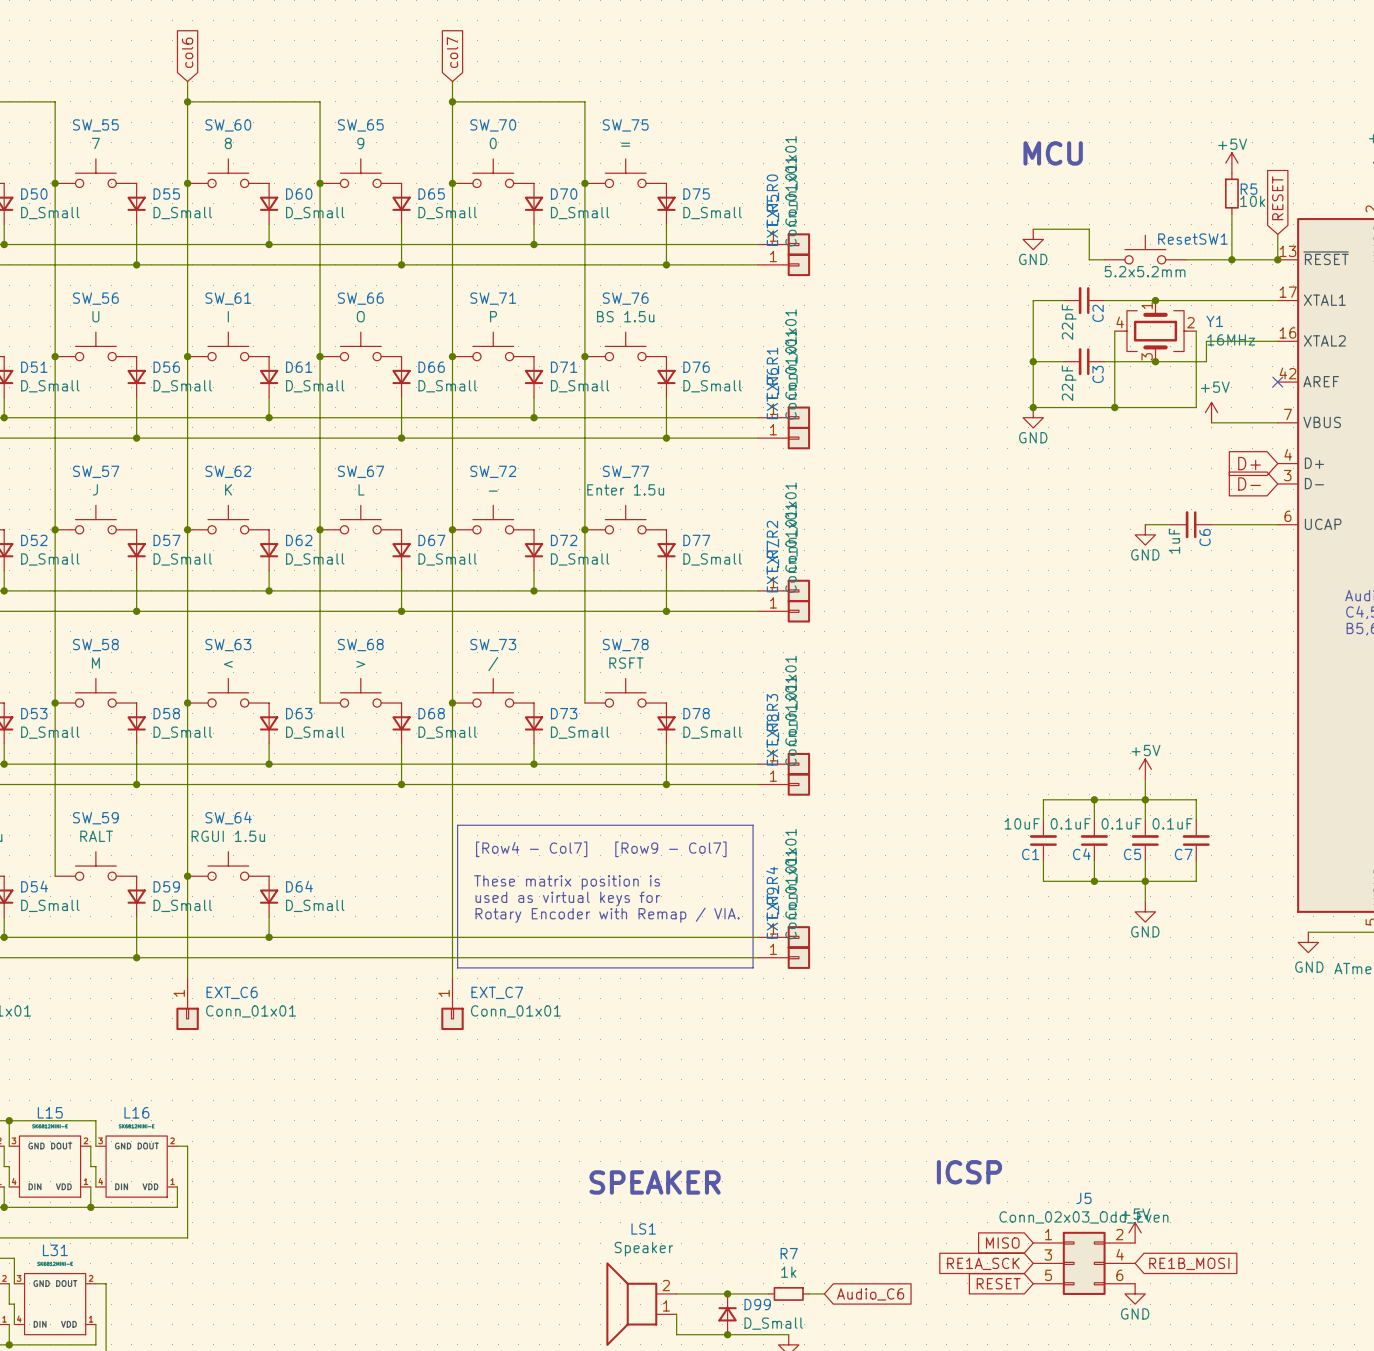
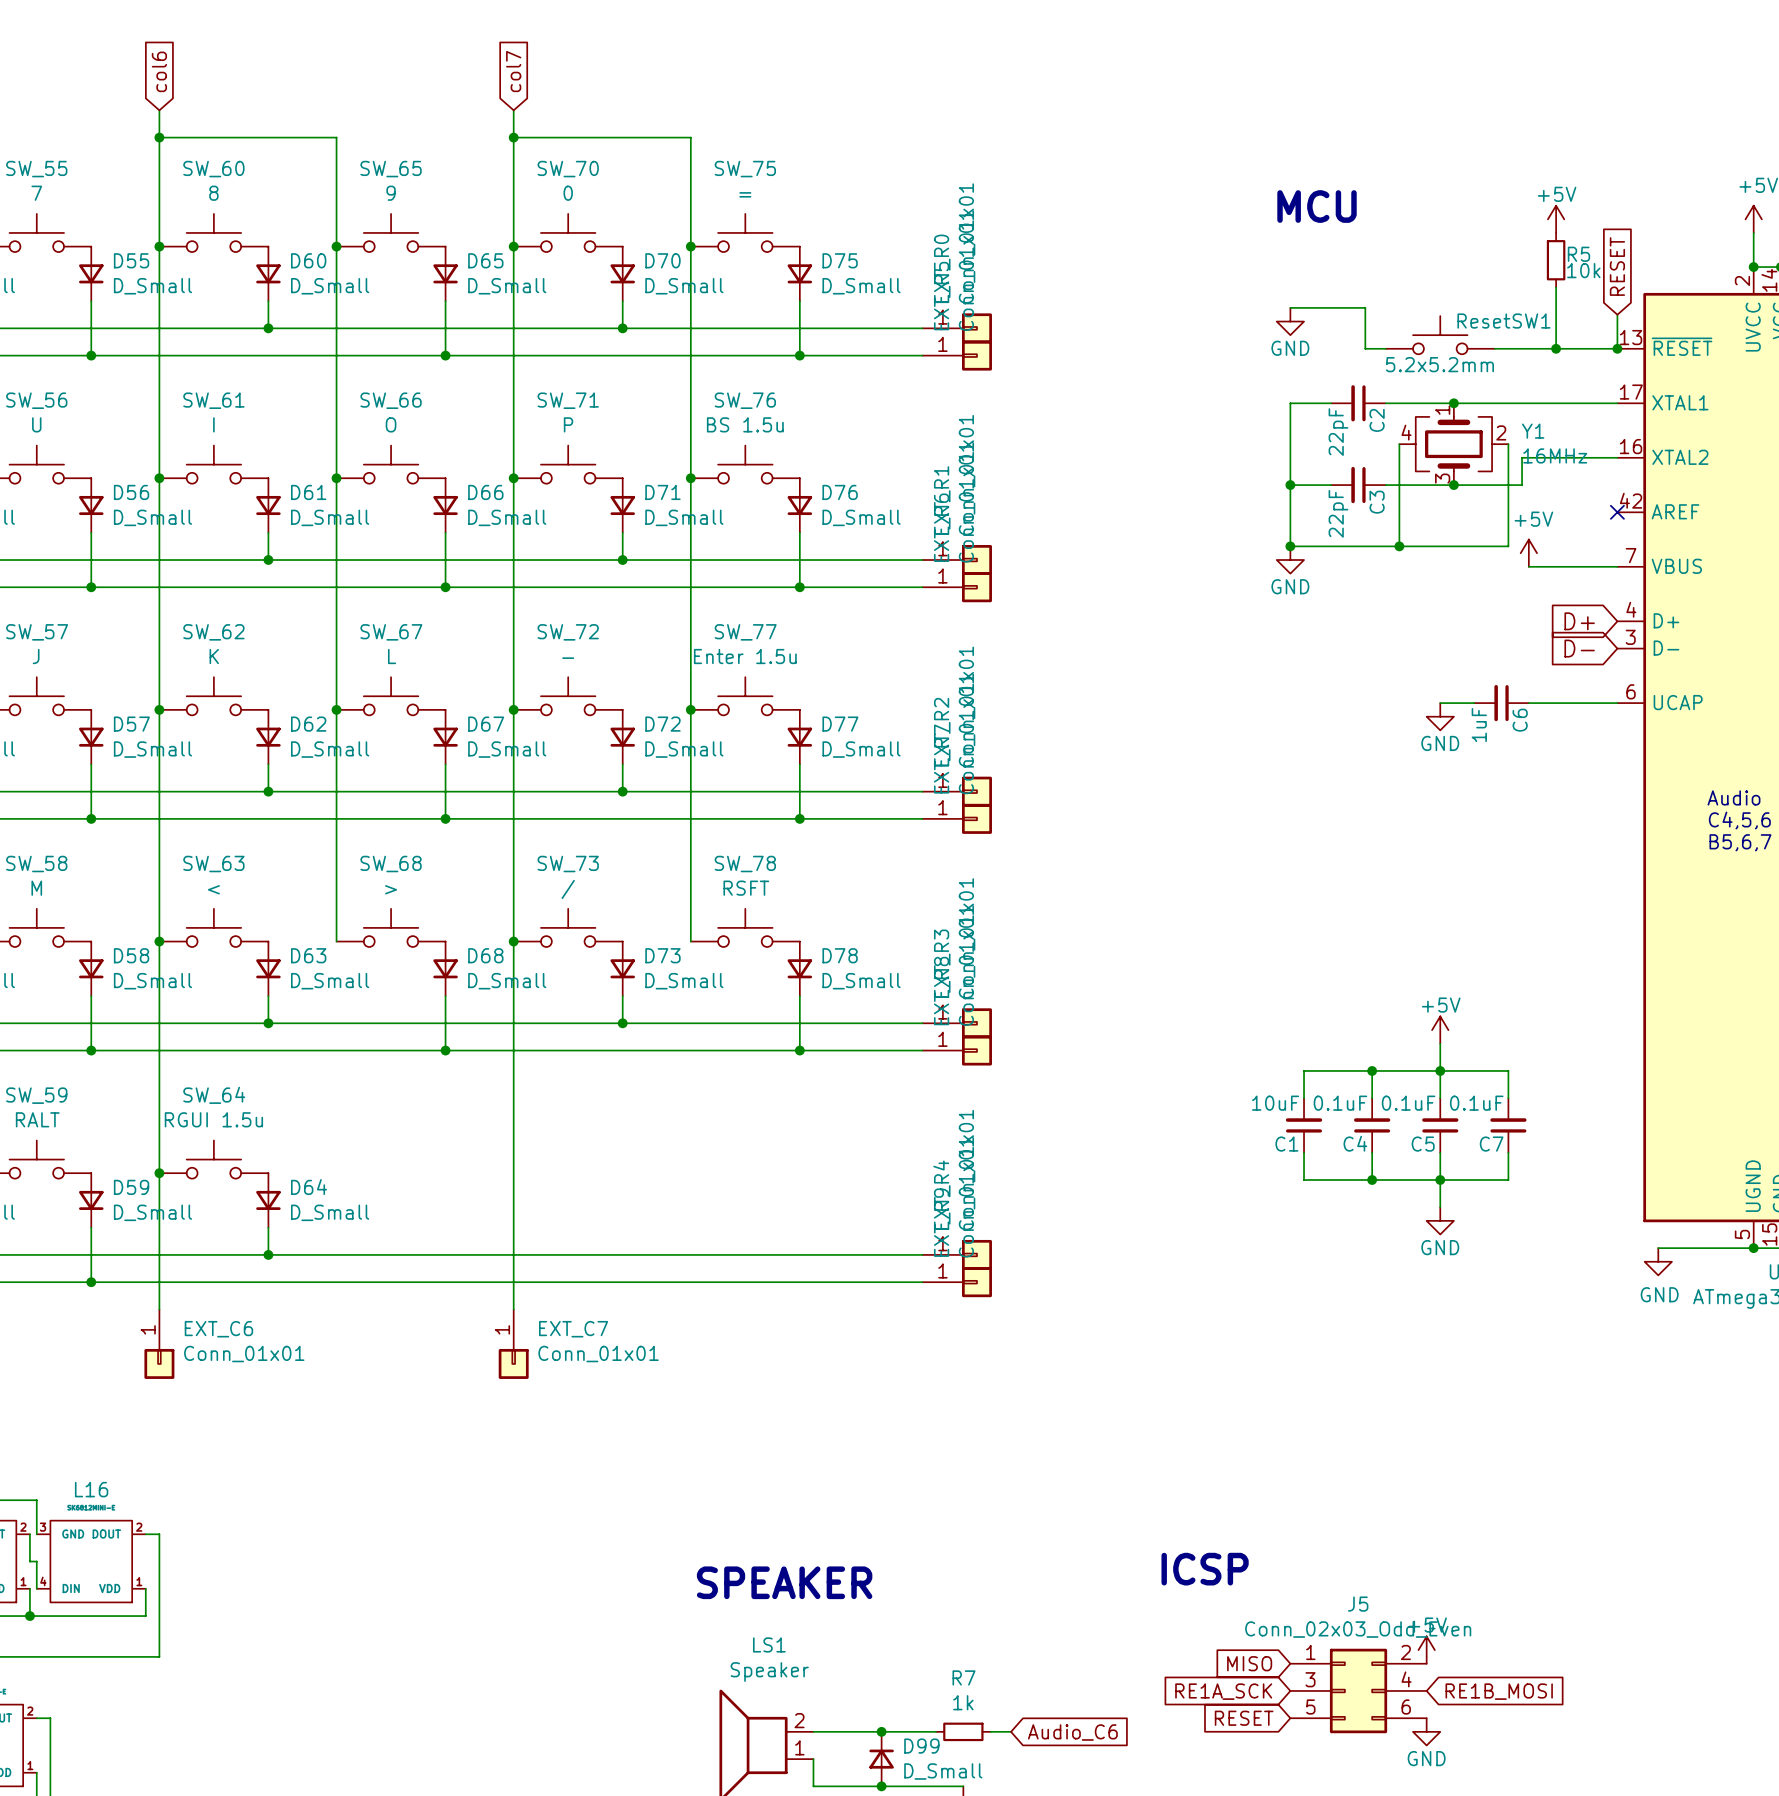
line: (457, 825) (457, 967) (753, 967) (753, 825) (457, 825) -> none
text: [Row4 - Col7] [Row9 - Col7] (601, 849) -> none
text: These matrix position is (567, 882) -> none
text: used as virtual keys for (567, 899) -> none
text: Rotary Encoder with Remap / VIA. (607, 915) -> none

